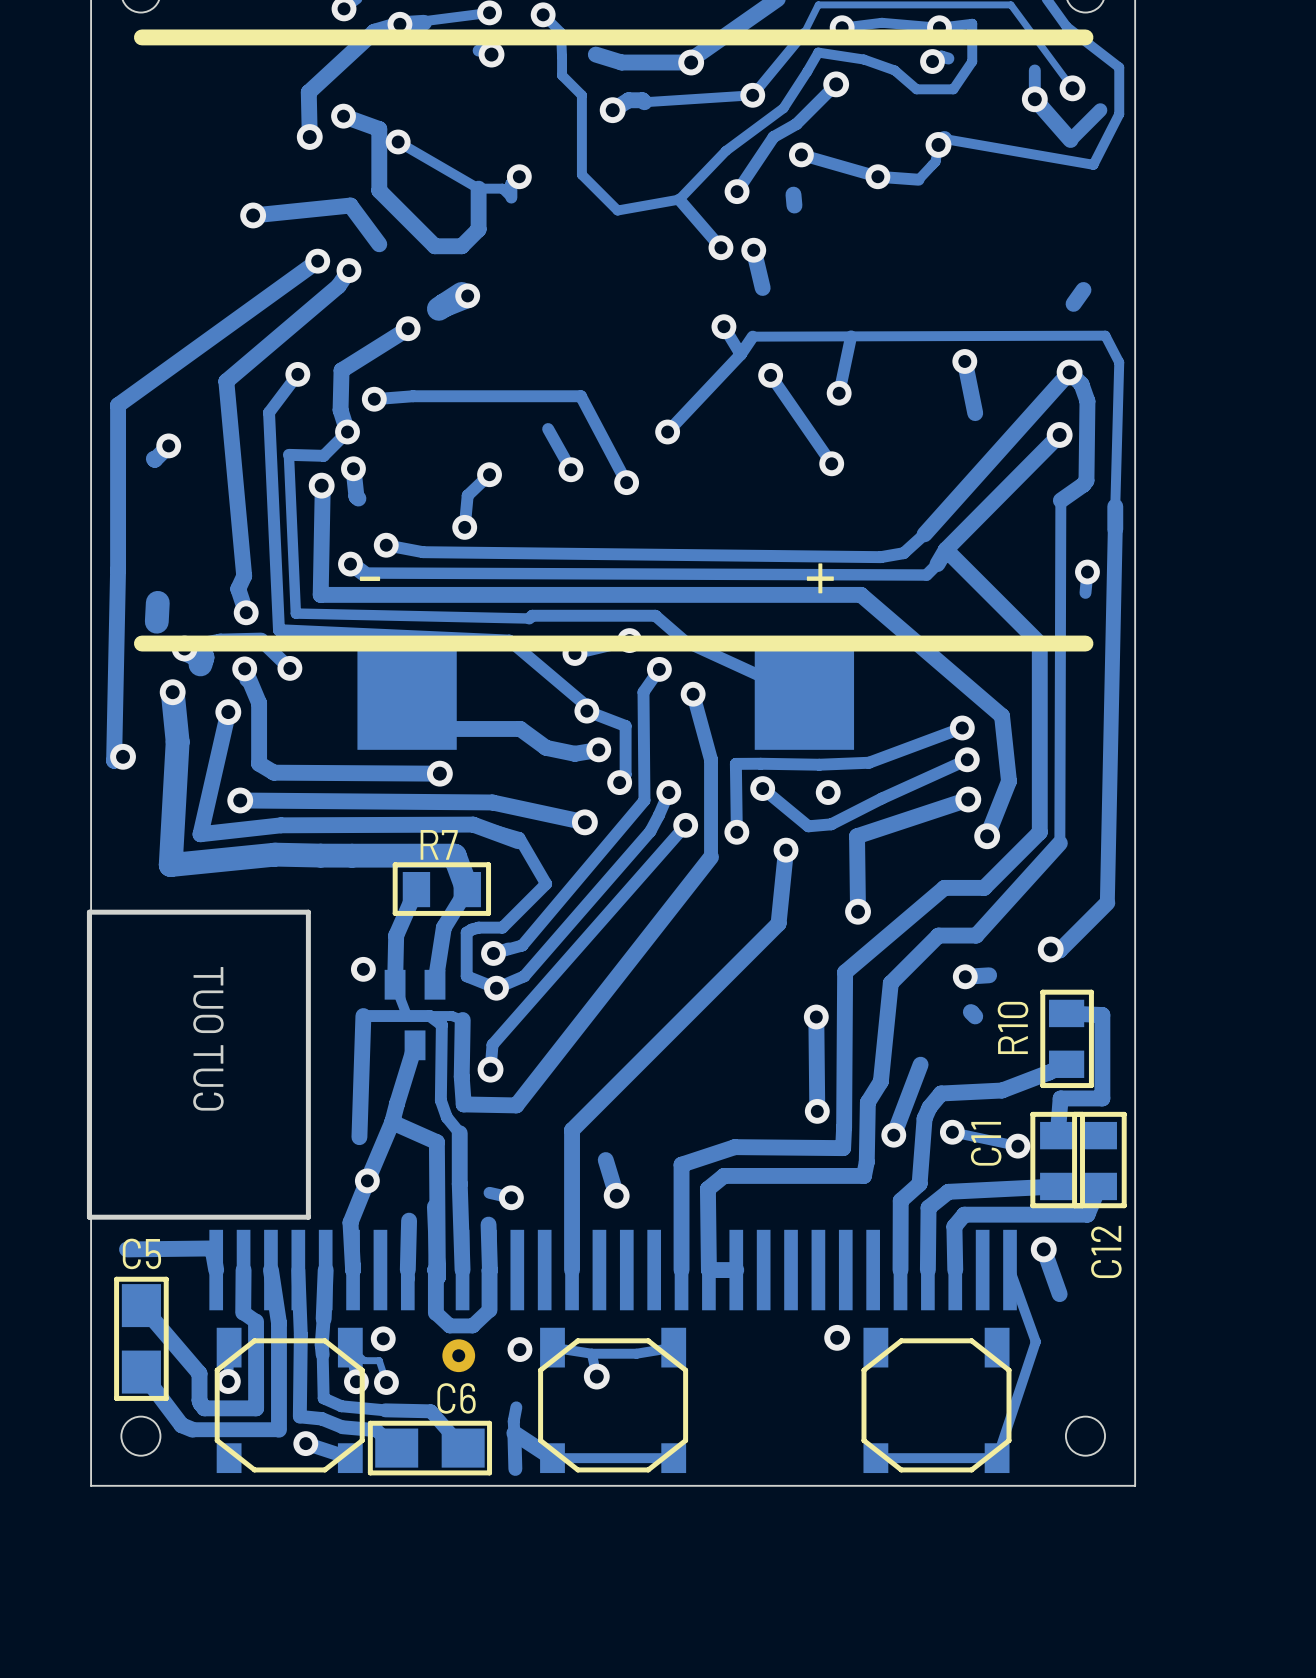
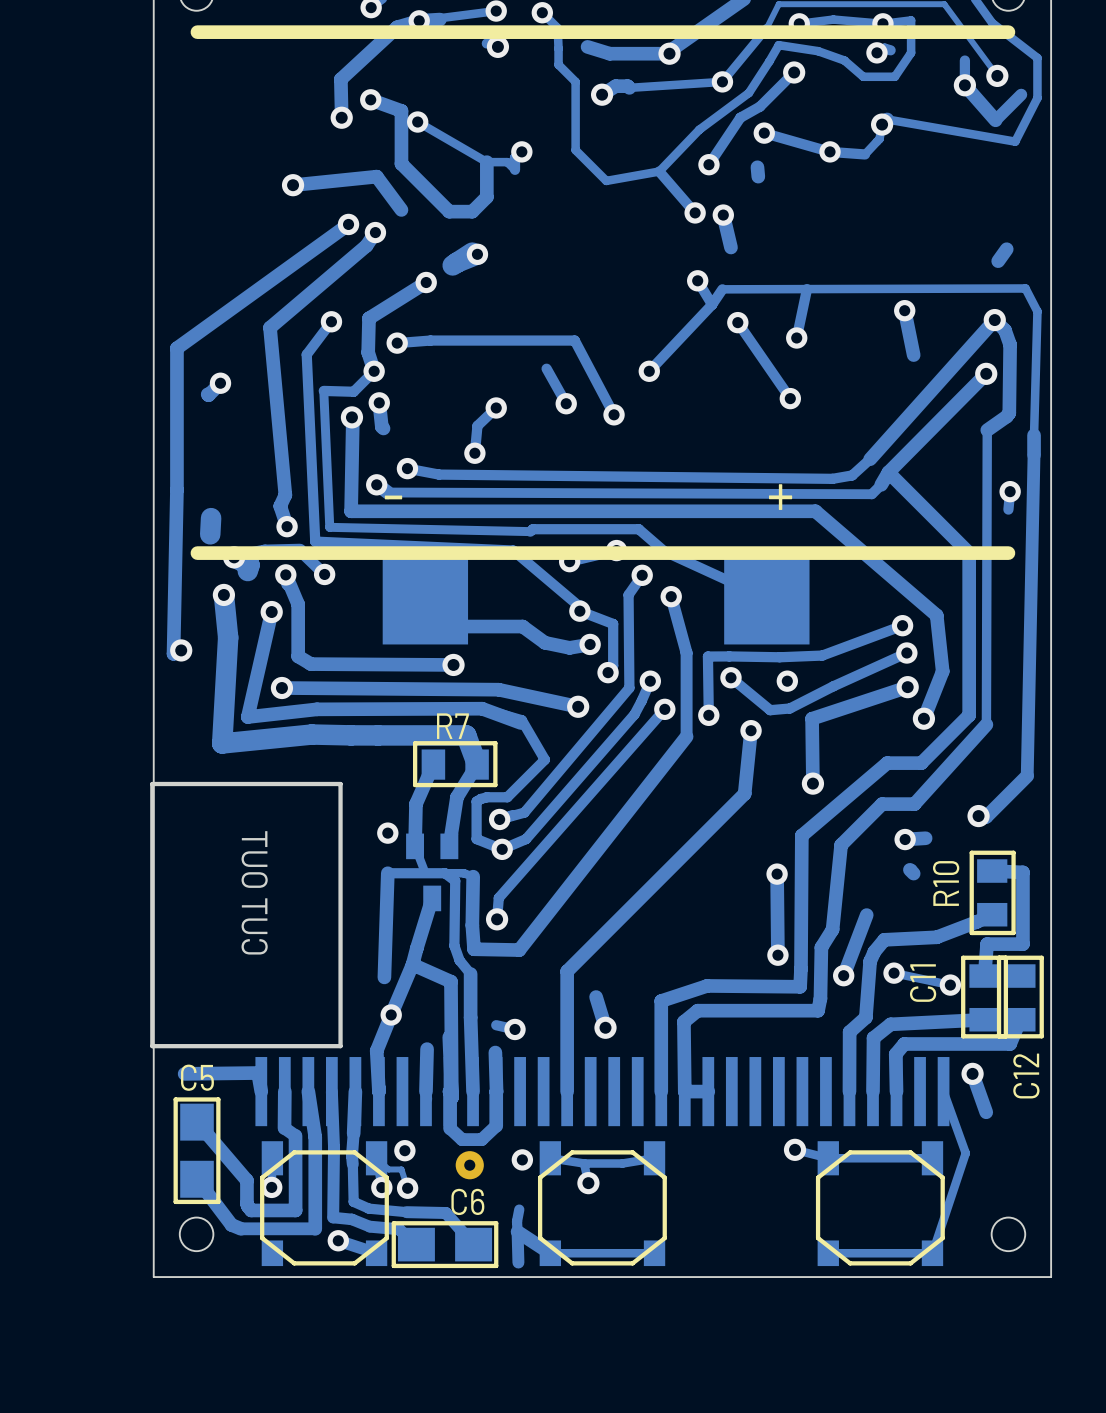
track: none -> (795, 1149) (828, 1158) (932, 1158)

